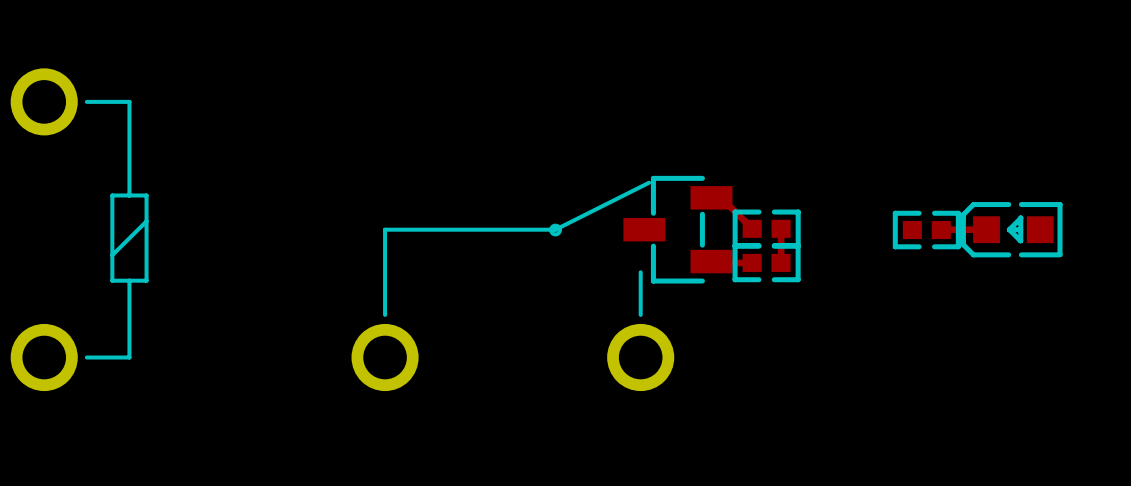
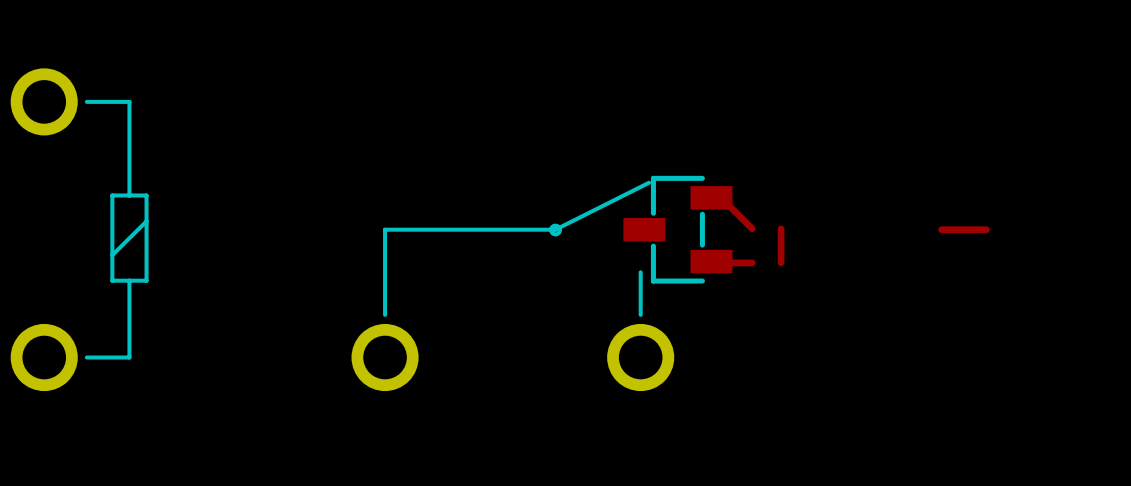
part: (766, 228) -> none
part: (1011, 229) -> none
part: (926, 230) -> none
part: (766, 262) -> none

